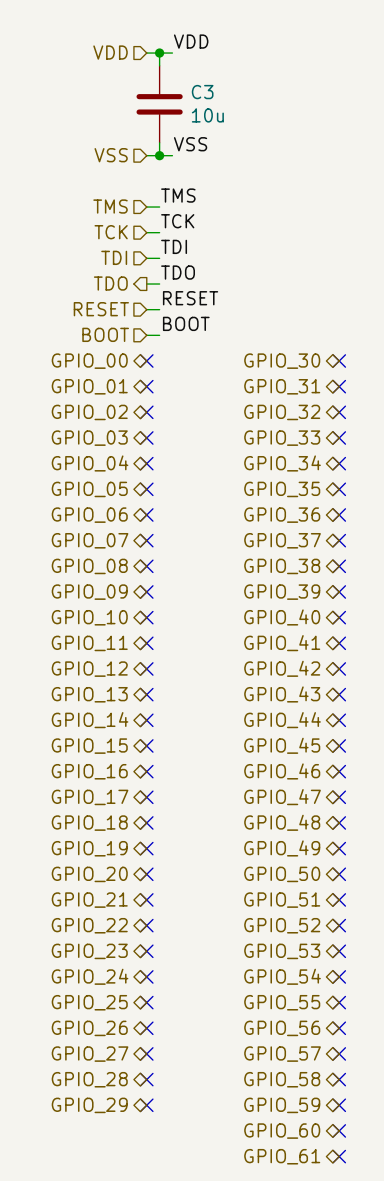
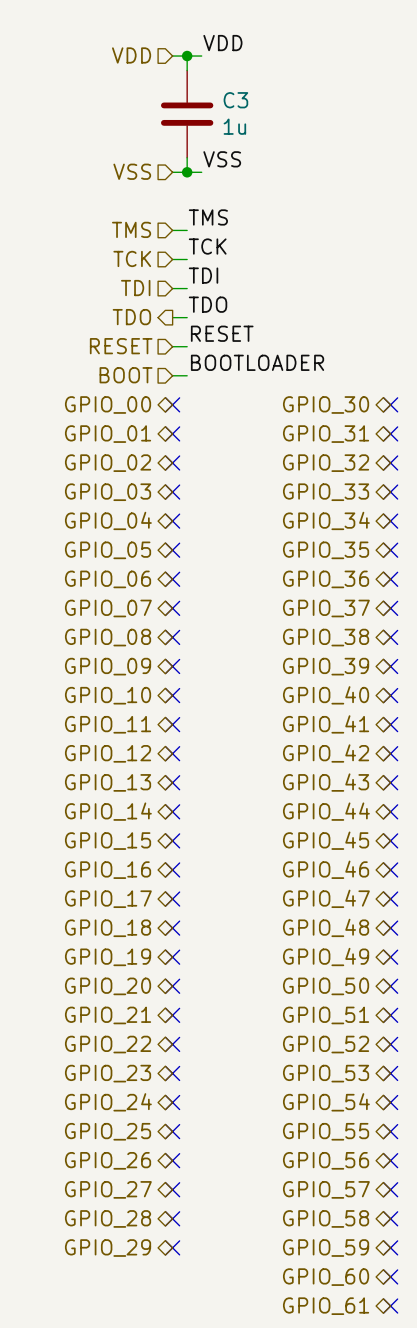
C3 value: 10u (207, 115) -> 1u (234, 126)
label: BOOT (186, 323) -> BOOTLOADER (257, 362)

